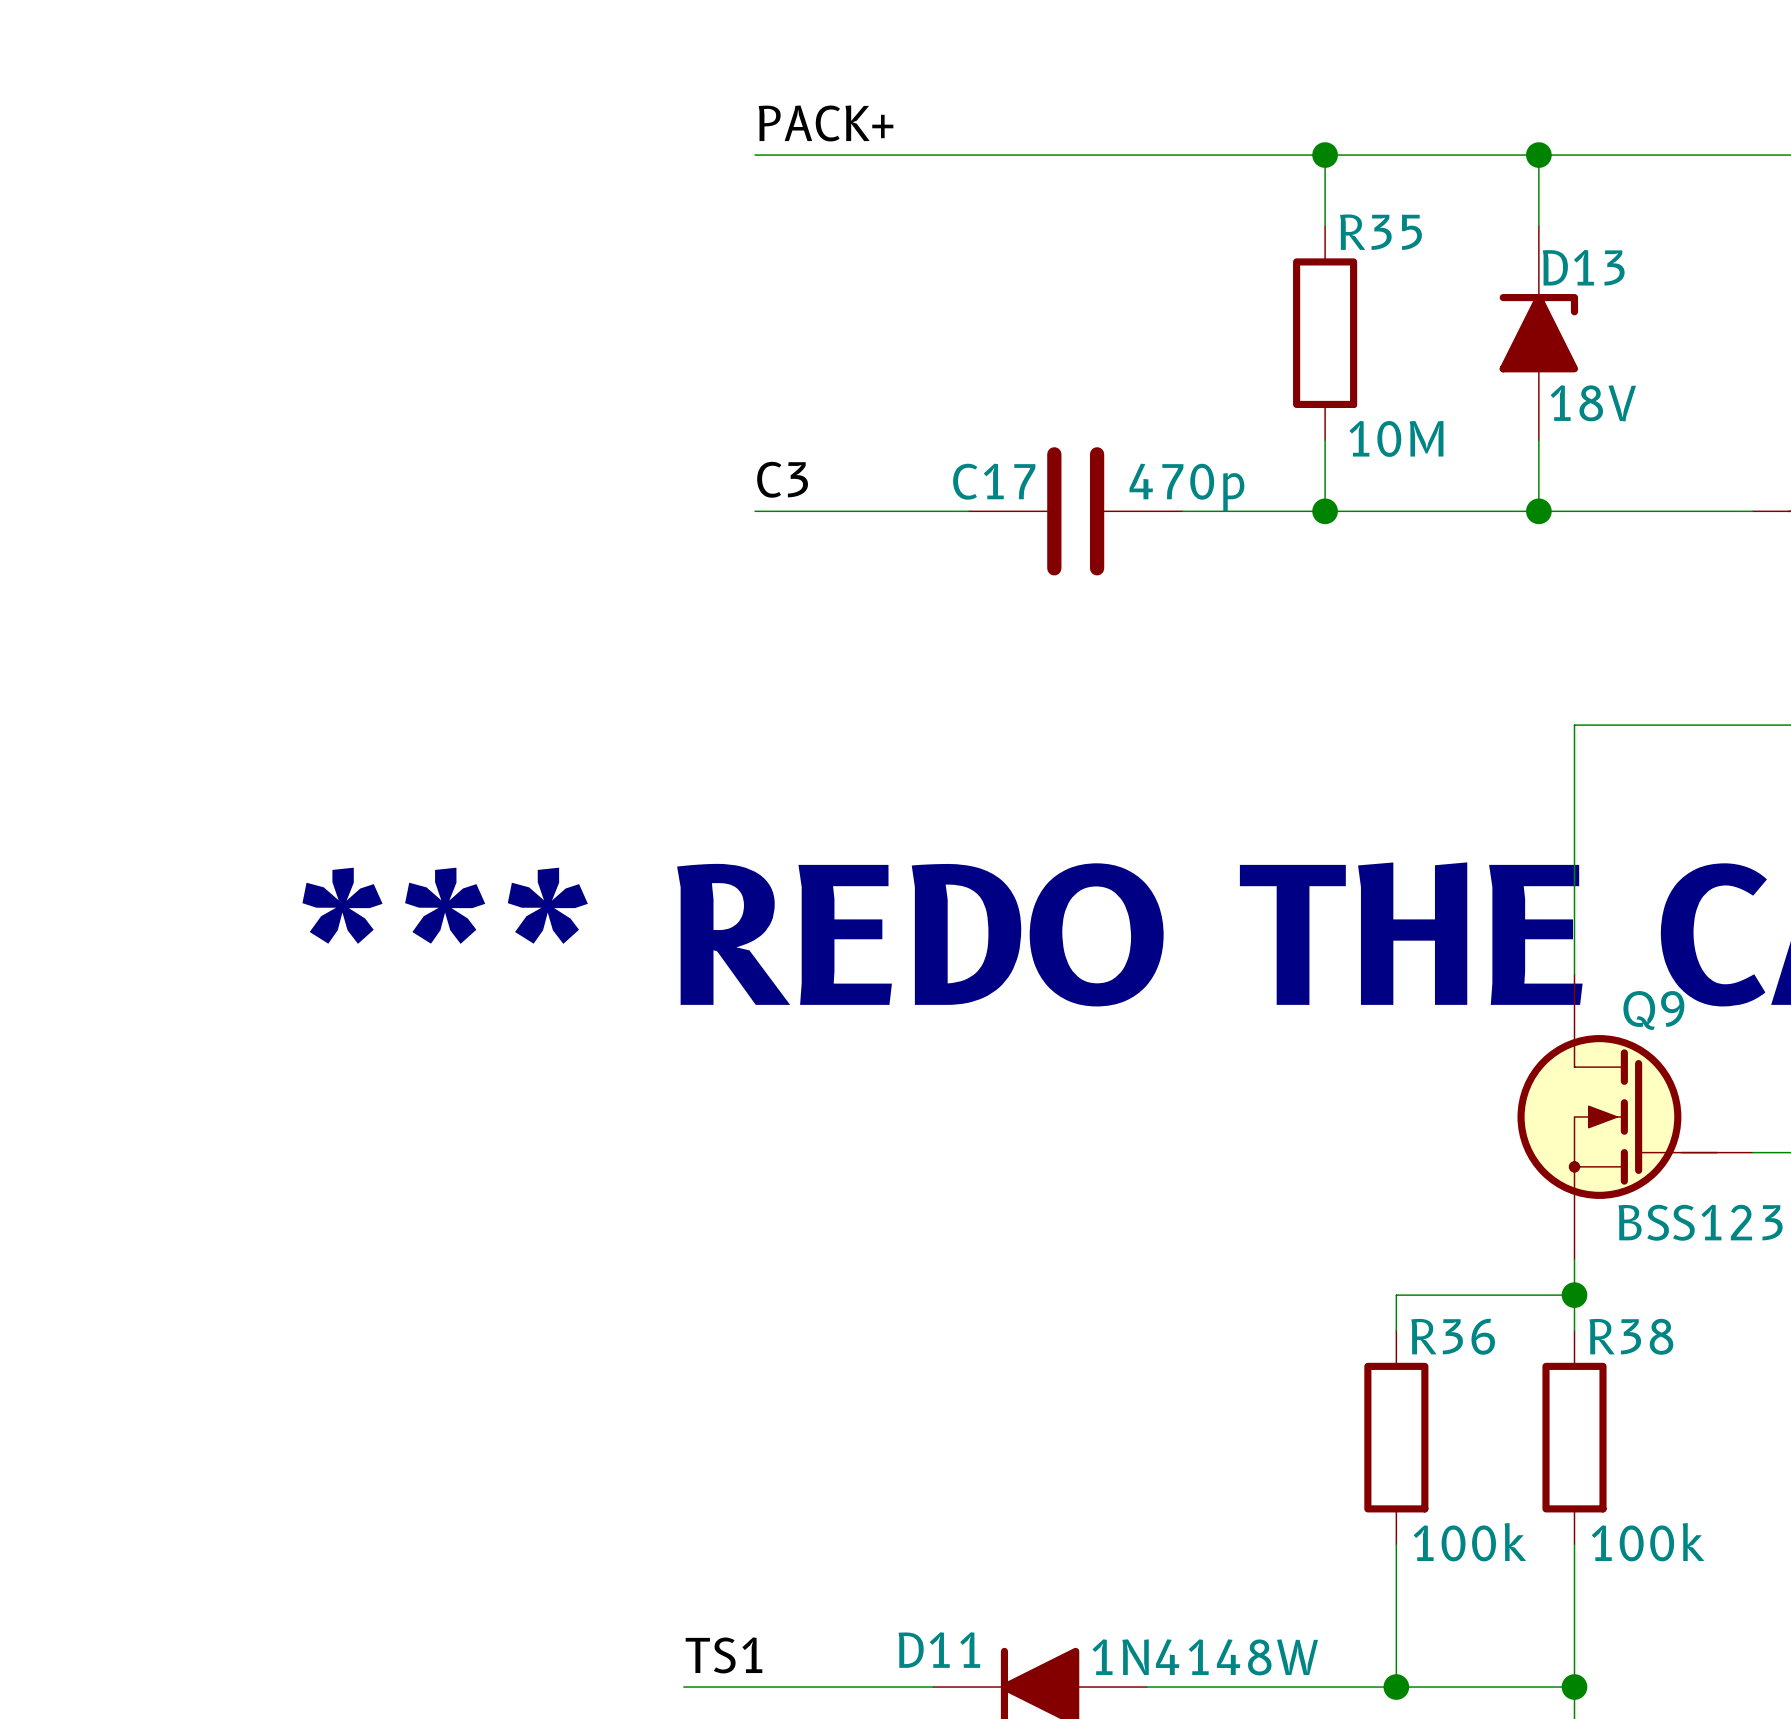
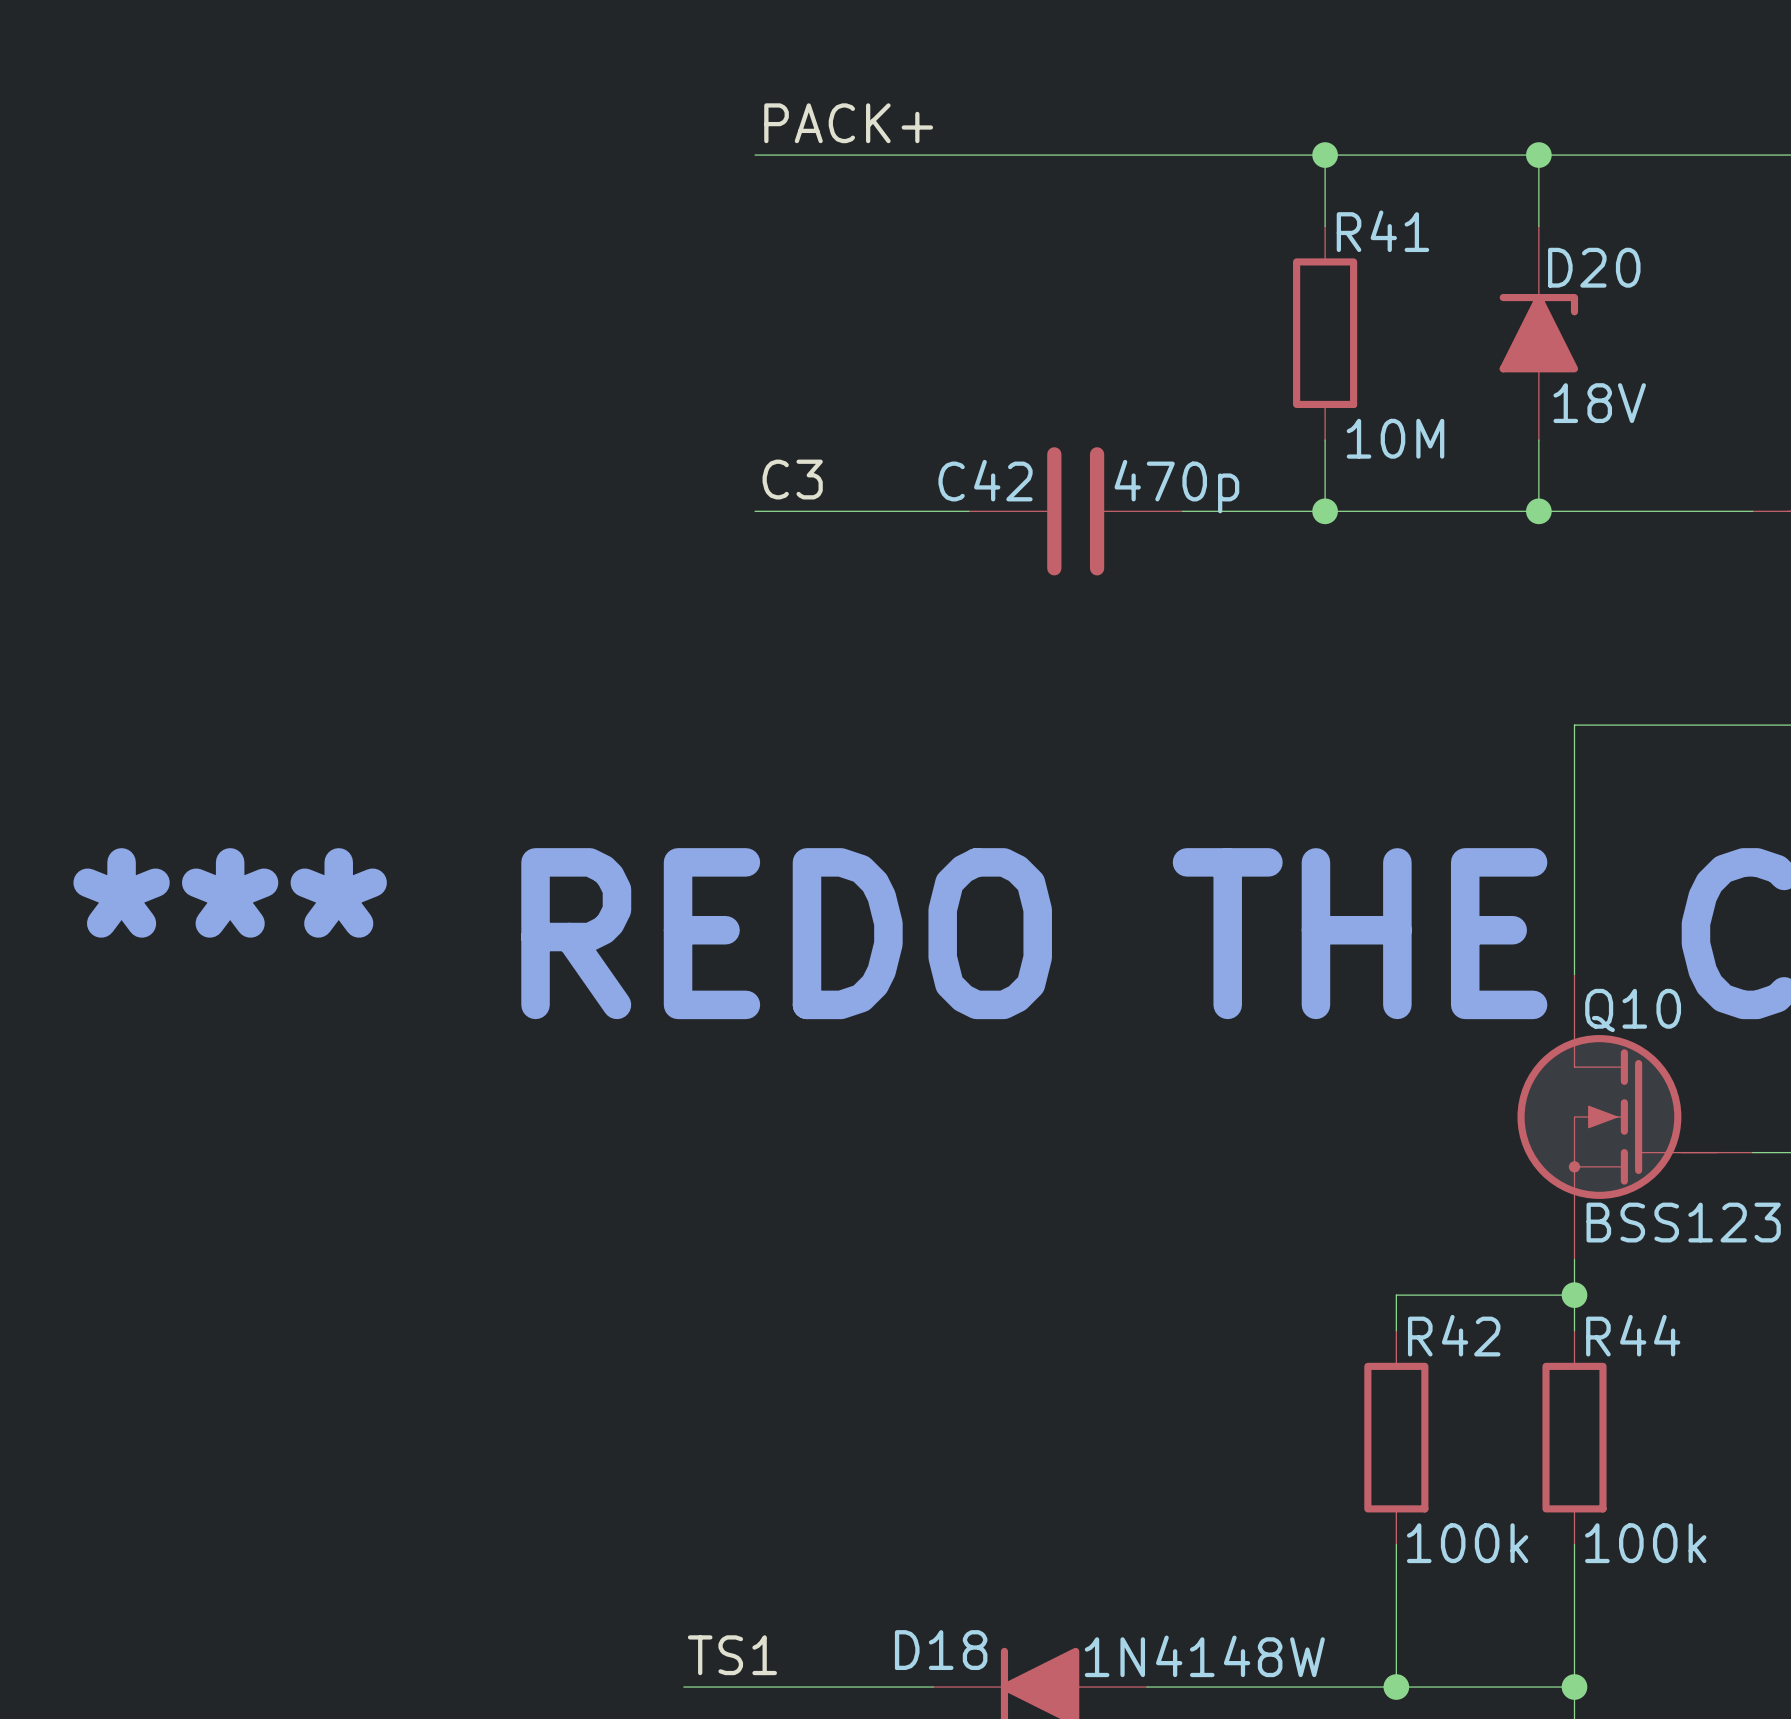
R35 name: R35 (1380, 232) -> R41 (1382, 231)
D13 name: D13 (1583, 267) -> D20 (1594, 267)
C17 name: C17 (994, 481) -> C42 (985, 480)
Q9 name: Q9 (1653, 1010) -> Q10 (1633, 1010)
R36 name: R36 (1453, 1336) -> R42 (1454, 1335)
R38 name: R38 (1631, 1336) -> R44 (1633, 1335)
D11 name: D11 (939, 1650) -> D18 (941, 1650)

